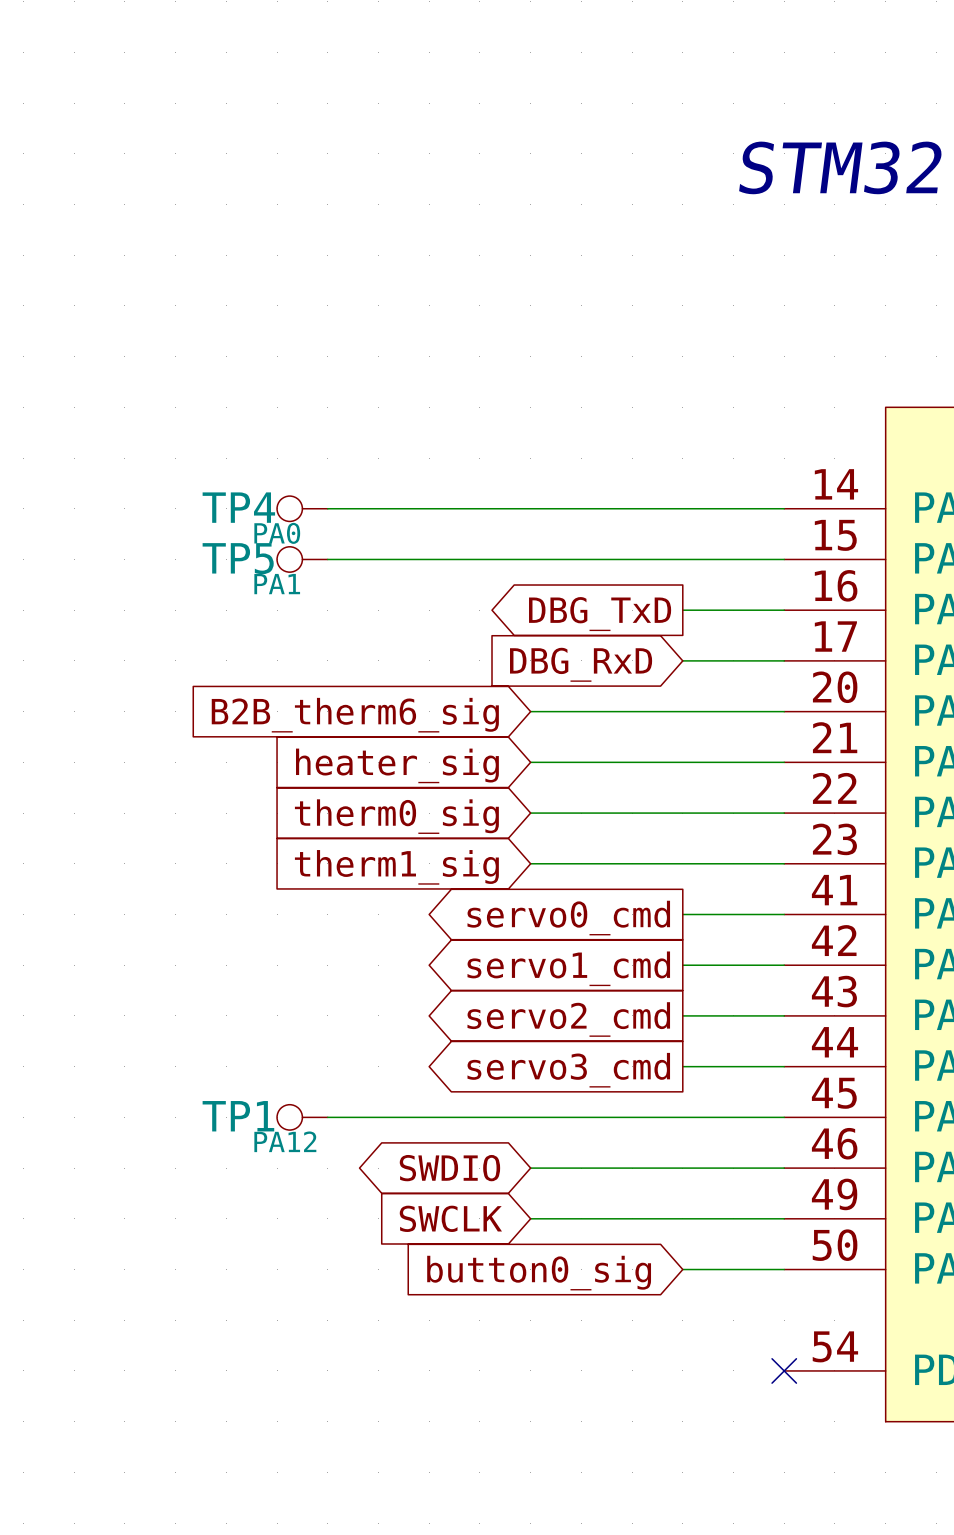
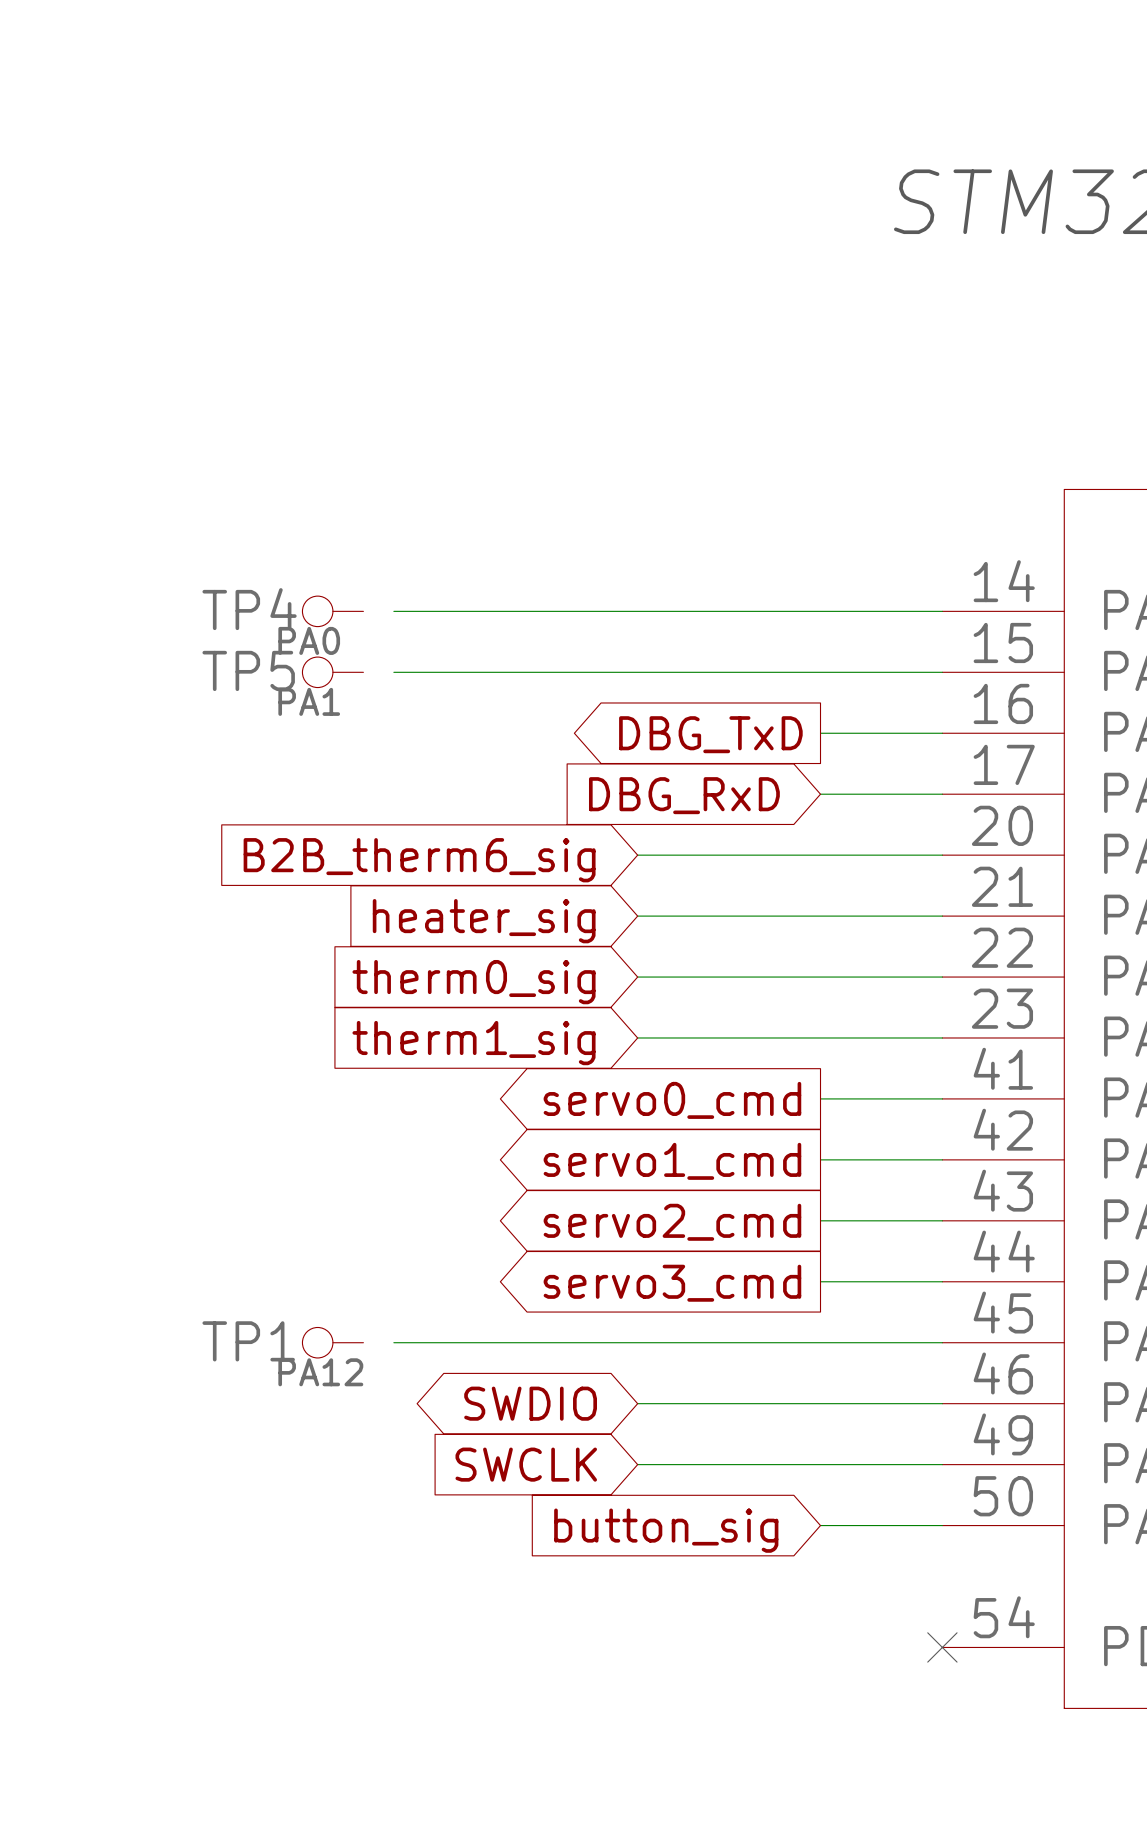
TP4 position: (302, 508) -> (332, 611)
TP5 position: (302, 559) -> (332, 672)
TP1 position: (302, 1117) -> (332, 1342)
global label: button0_sig (539, 1273) -> button_sig (666, 1530)

